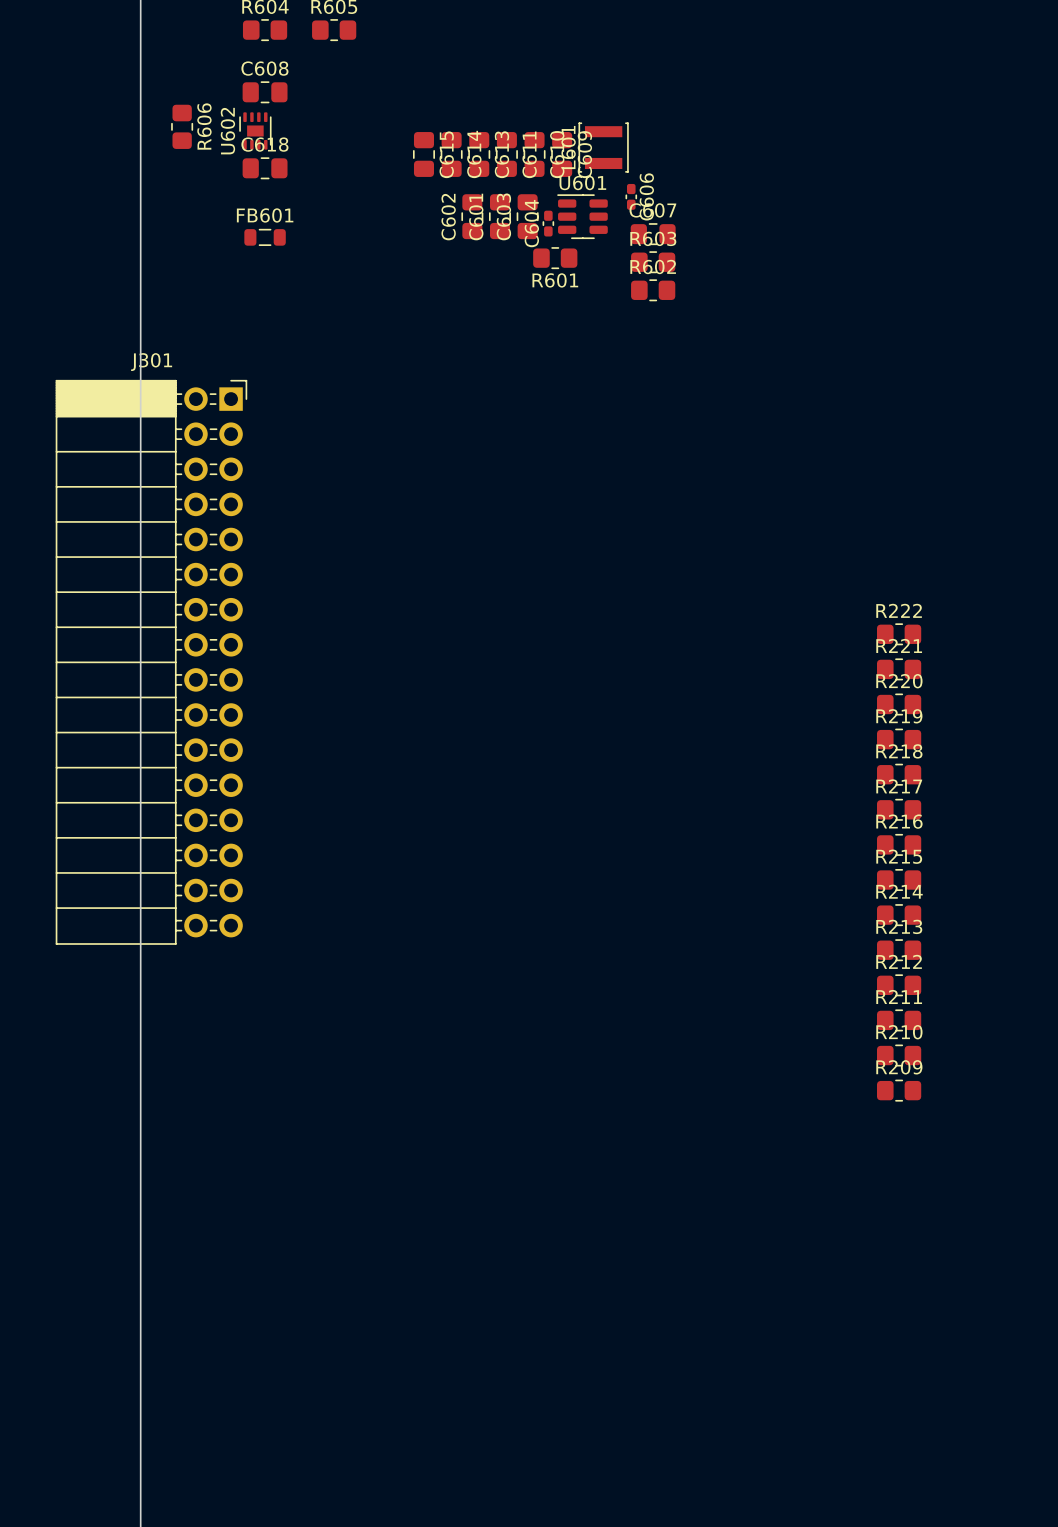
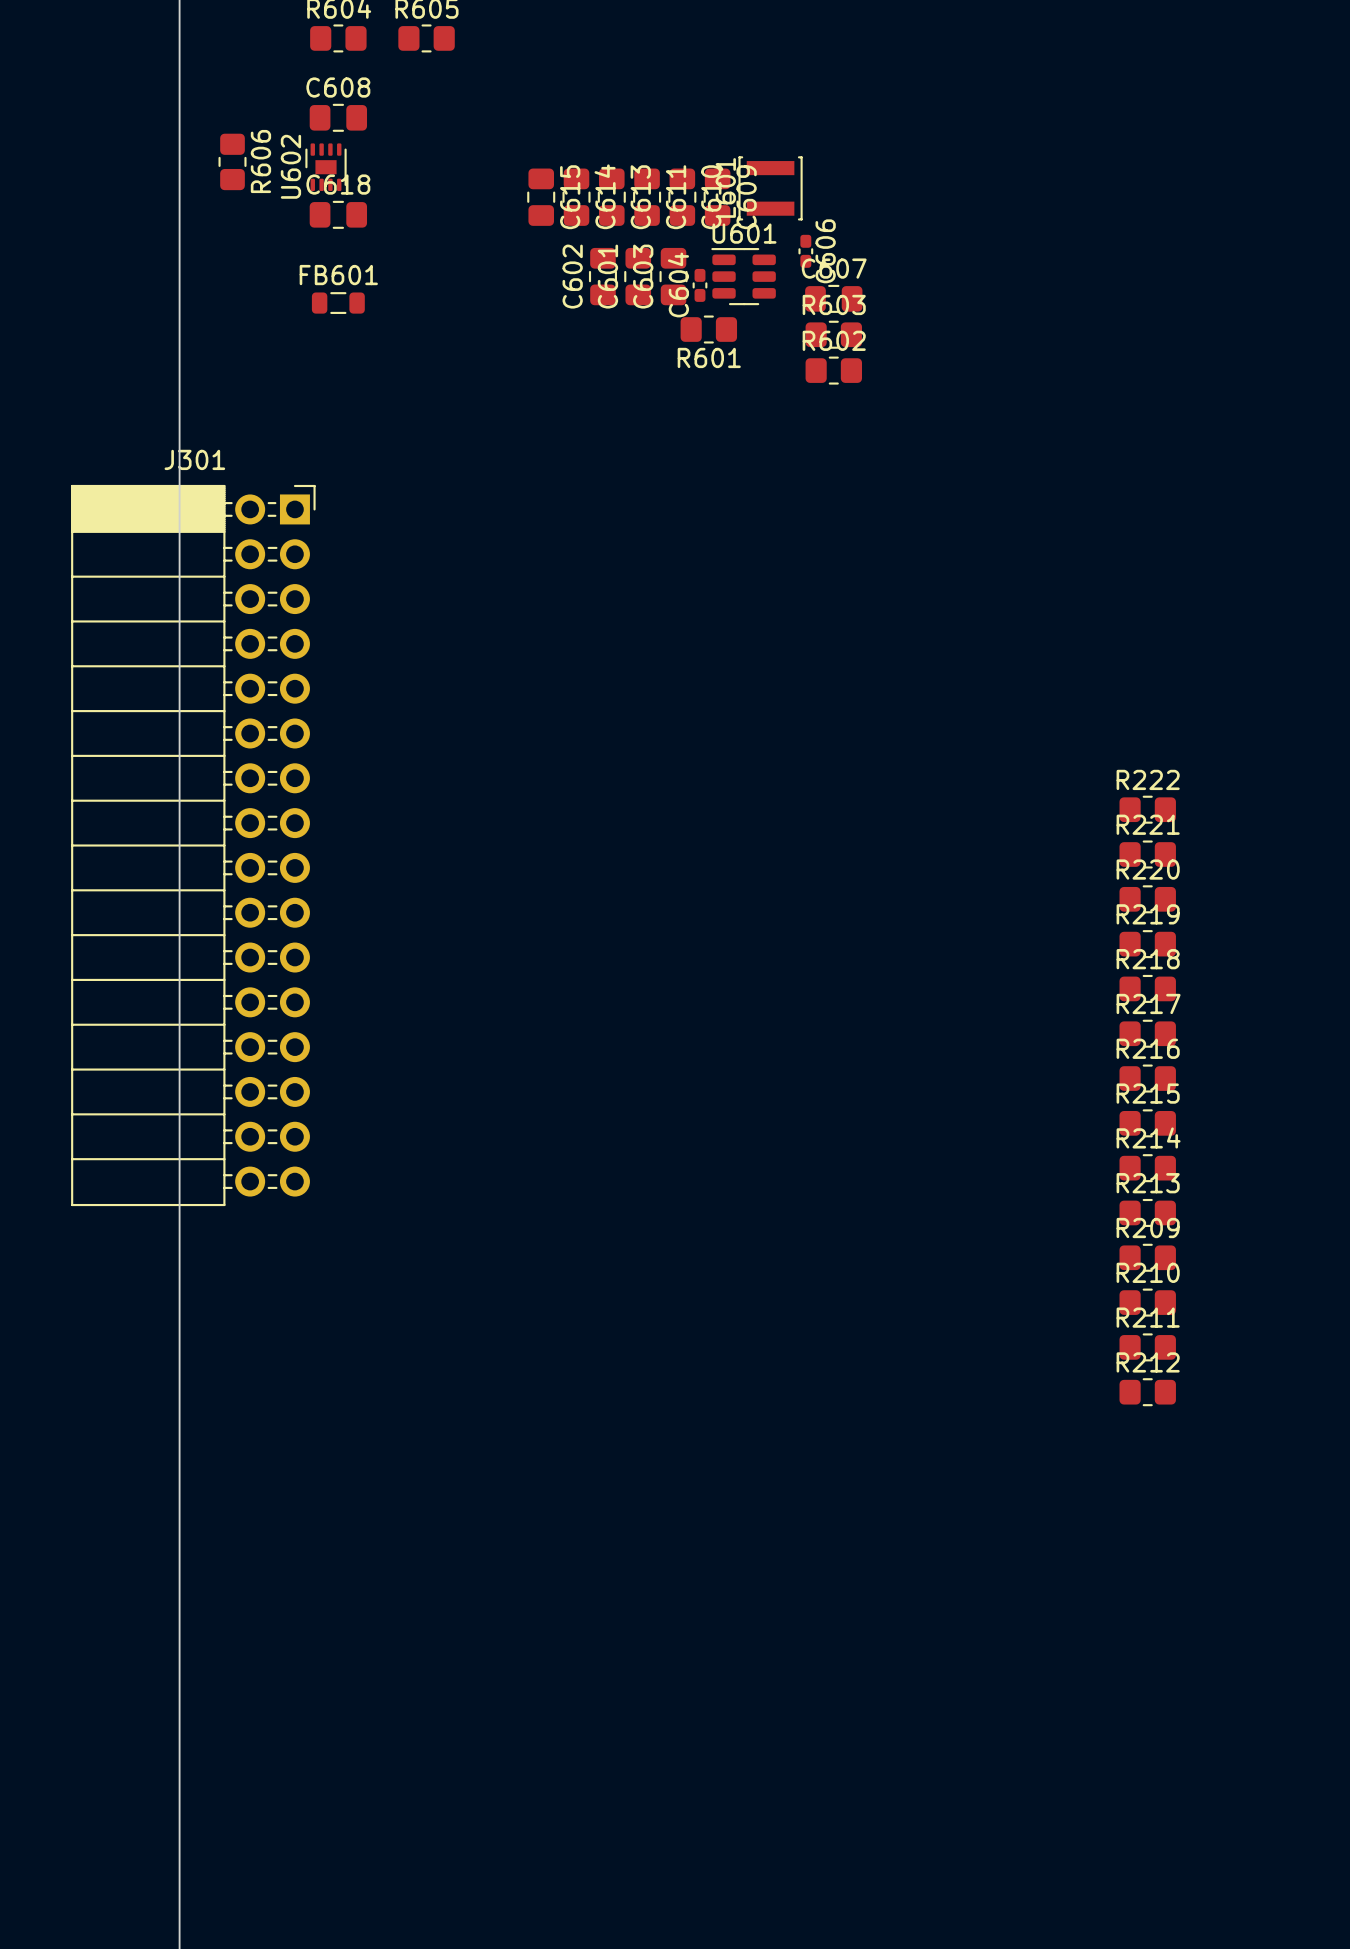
R212 name: R212 (899, 961) -> R209 (1148, 1228)
R211 name: R211 (899, 996) -> R210 (1148, 1272)
R210 name: R210 (899, 1032) -> R211 (1148, 1317)
R209 name: R209 (899, 1067) -> R212 (1148, 1362)

